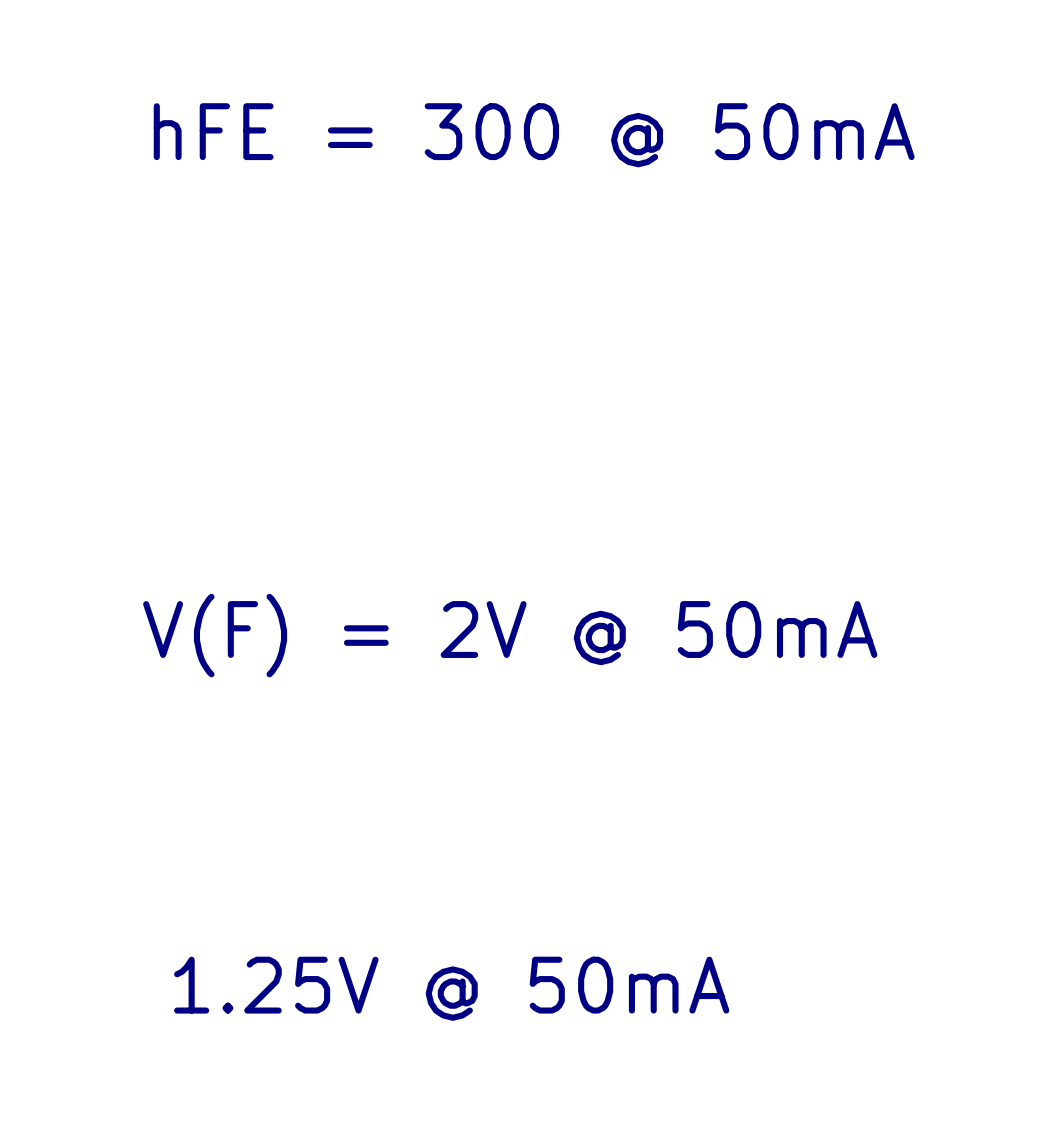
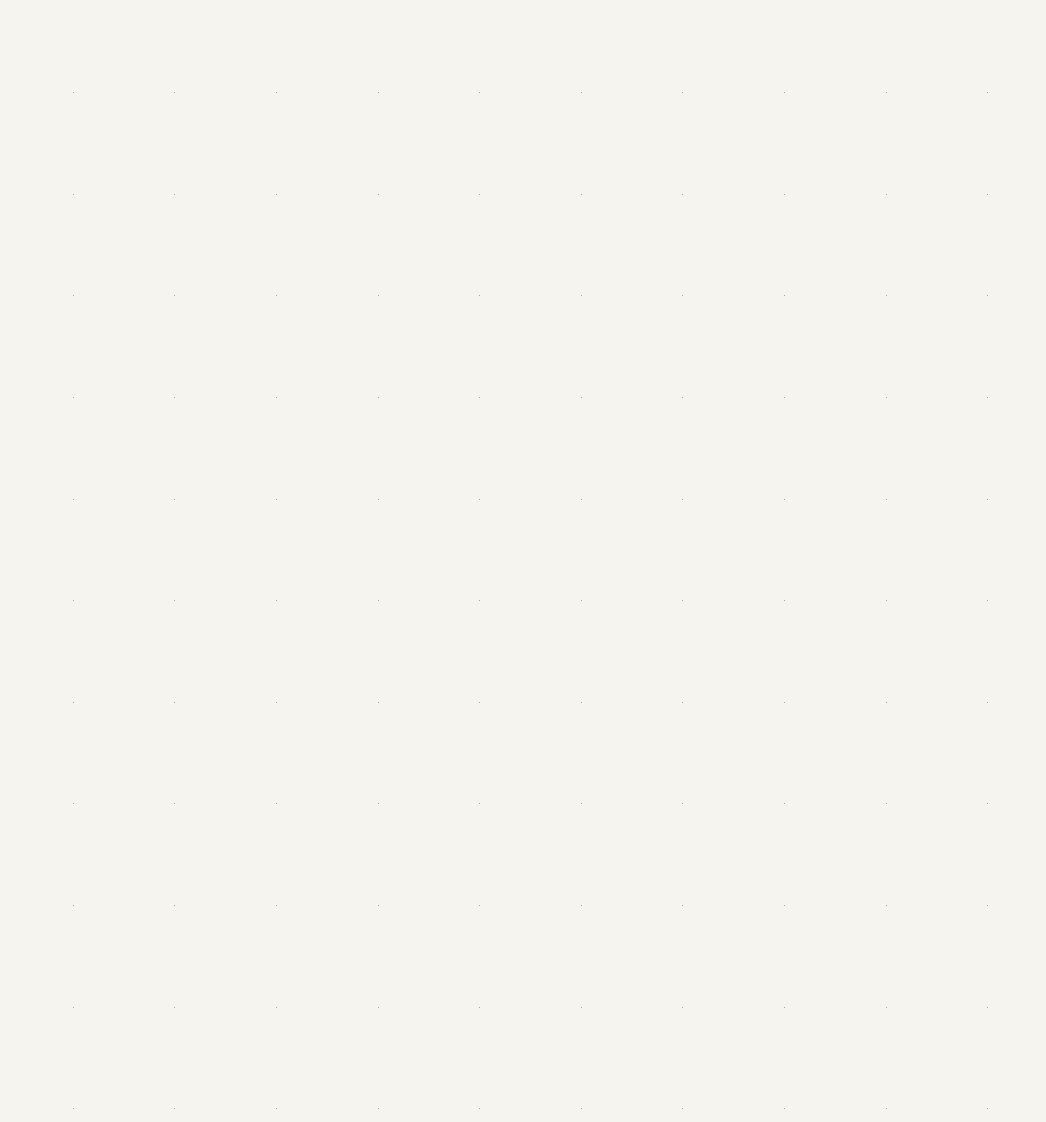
text: hFE = 300 @ 50mA (534, 135) -> none
text: V(F) = 2V @ 50mA (510, 635) -> none
text: 1.25V @ 50mA (451, 988) -> none

